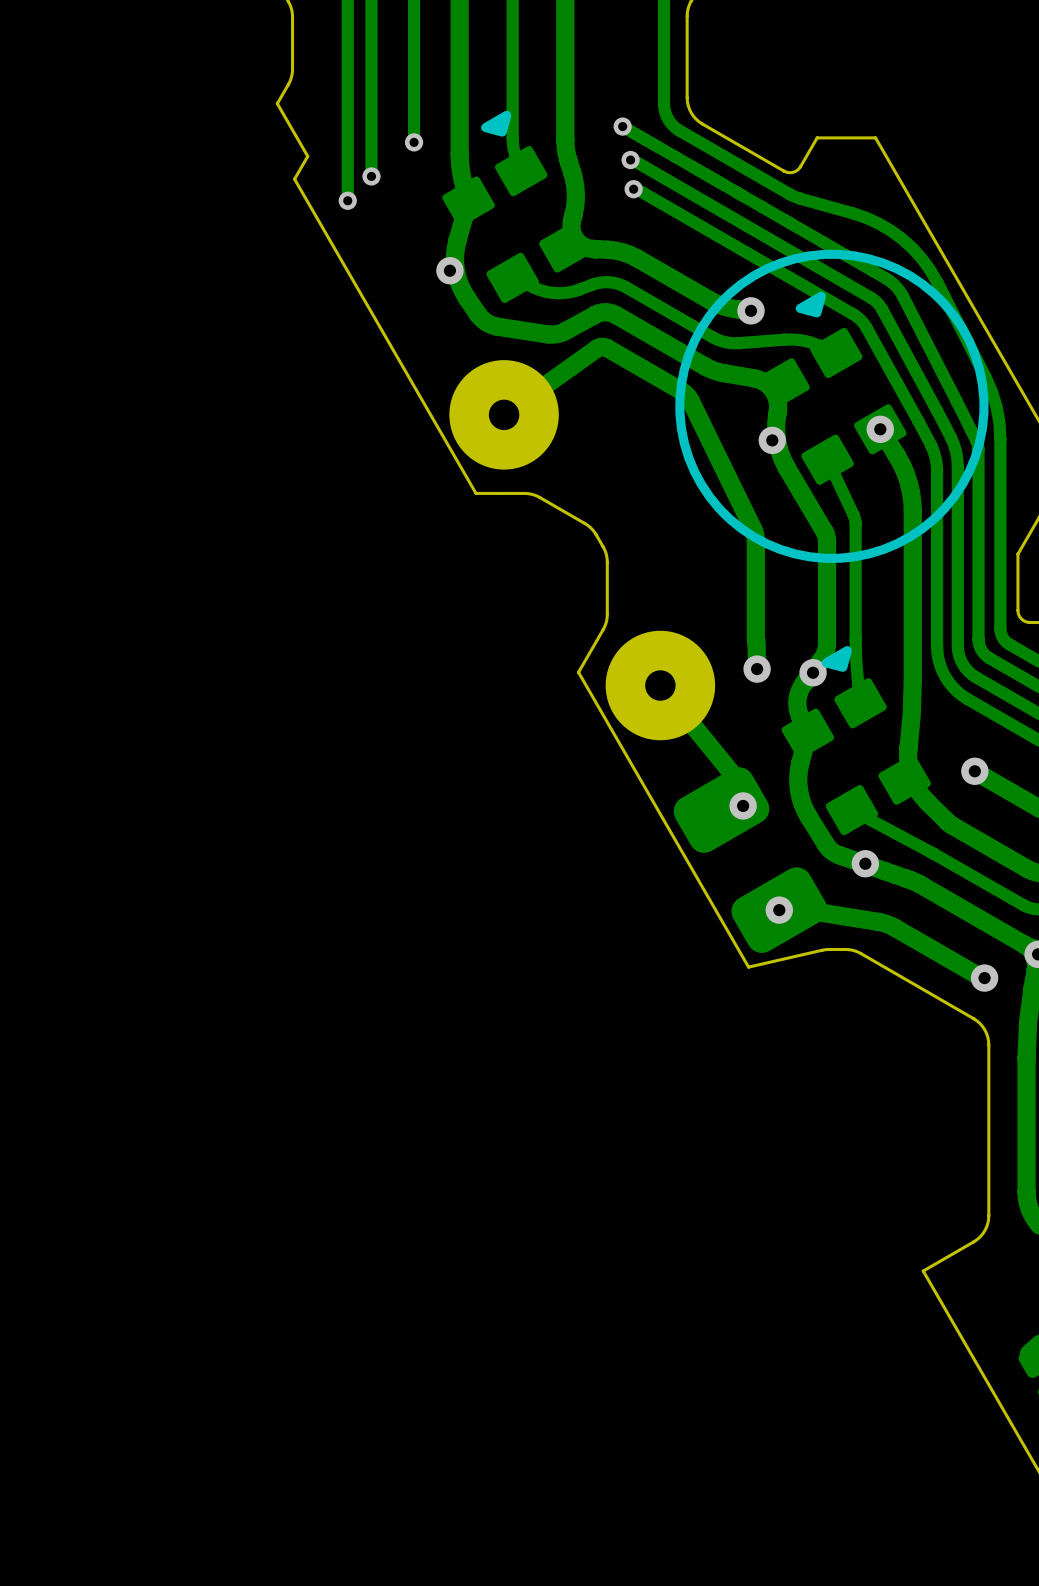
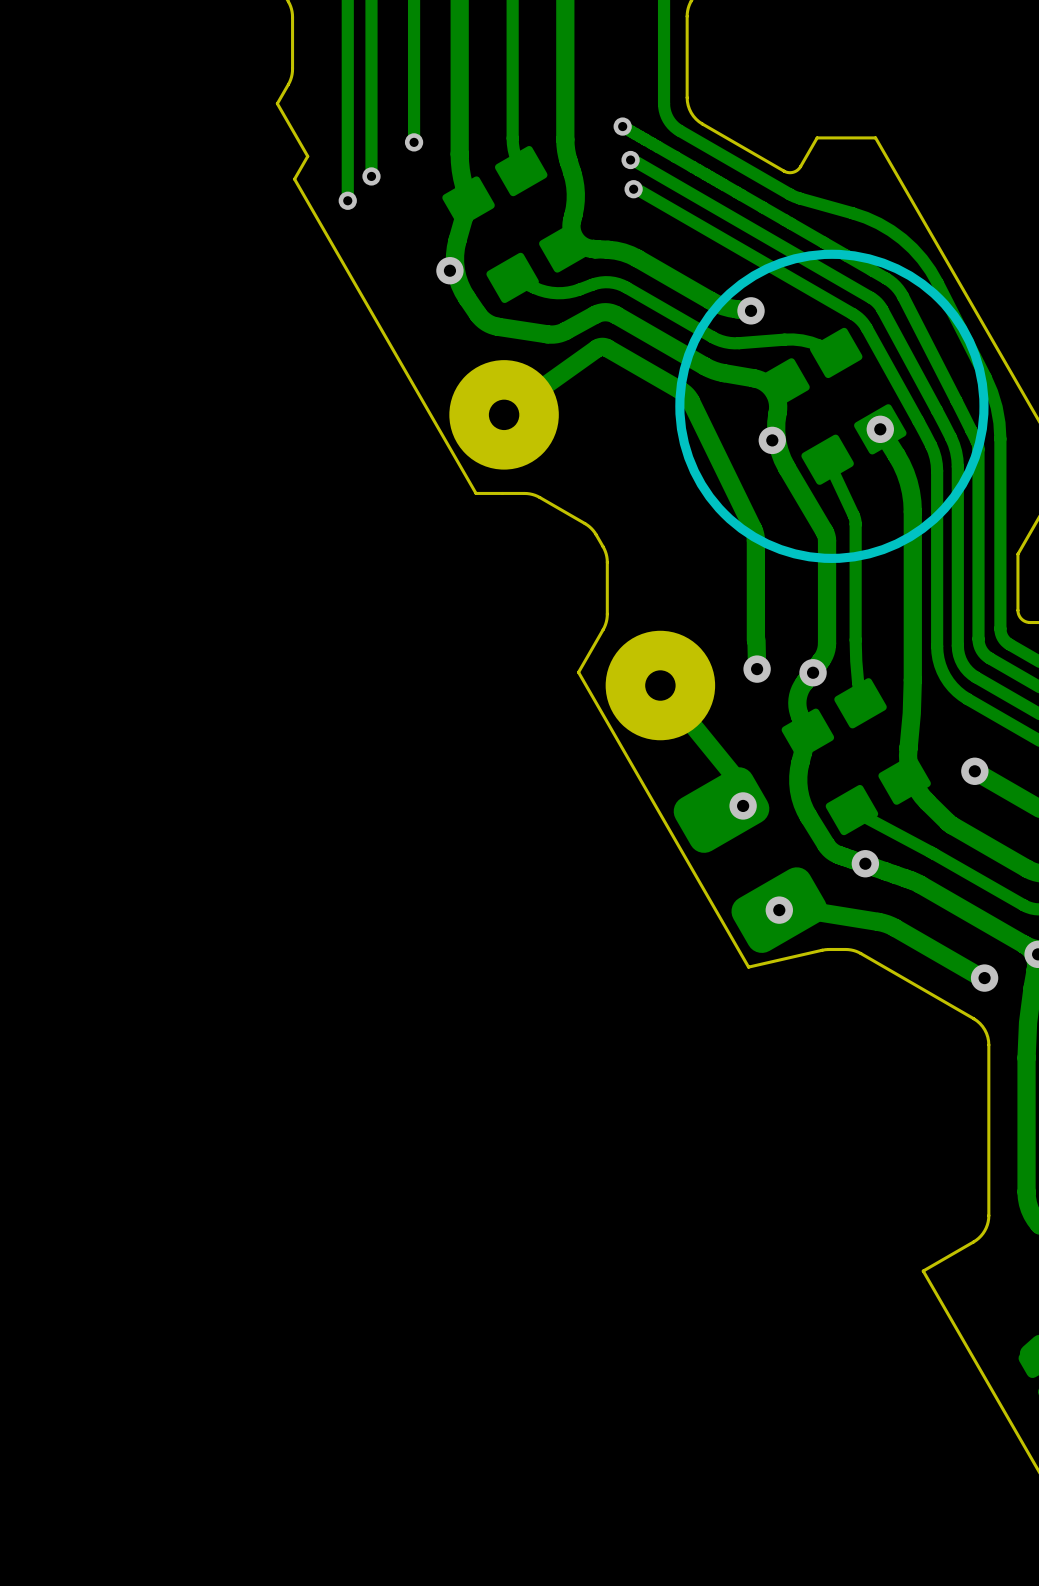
drawing: [481, 110, 512, 137] -> none
drawing: [795, 291, 826, 318] -> none
drawing: [821, 646, 852, 672] -> none

